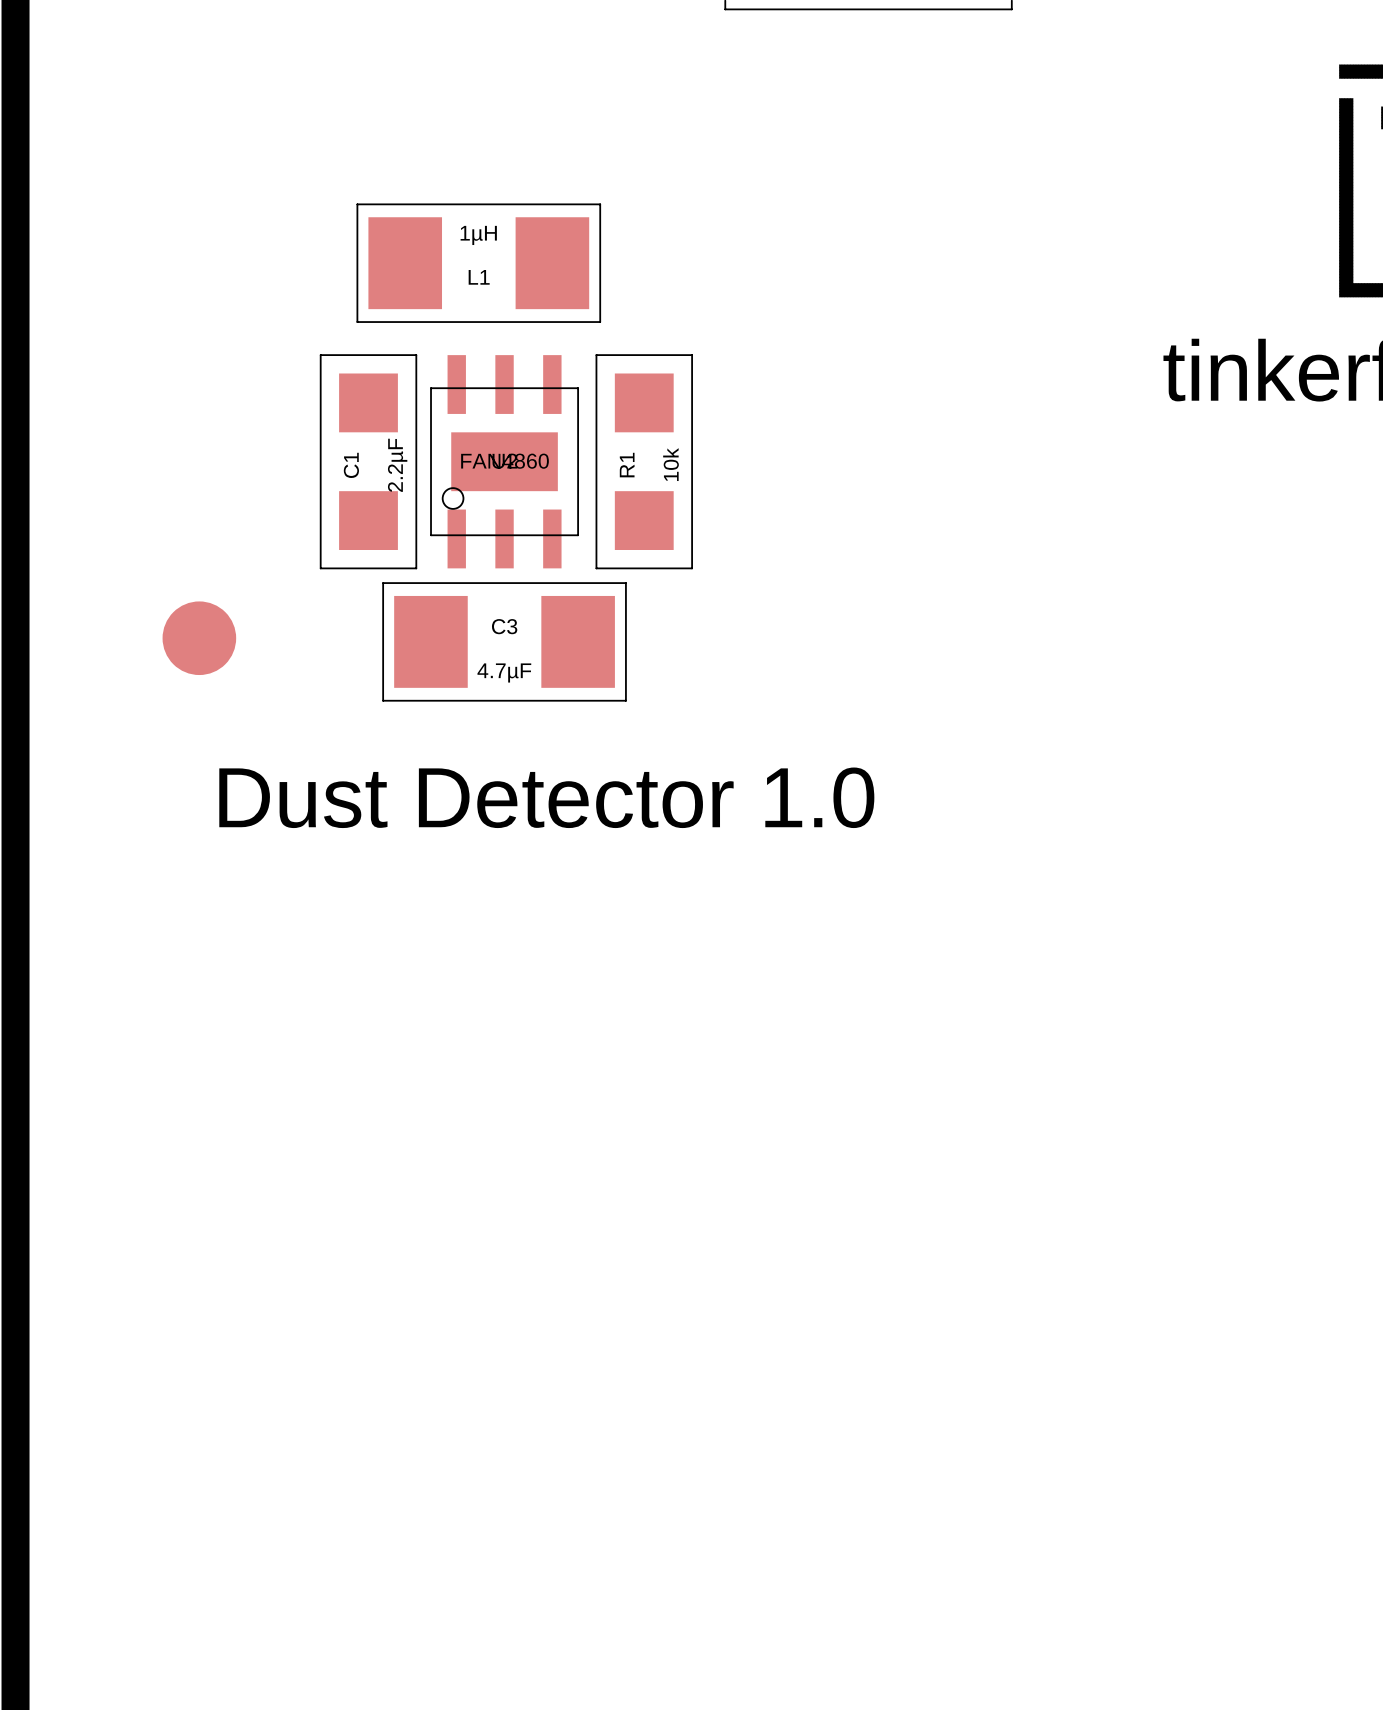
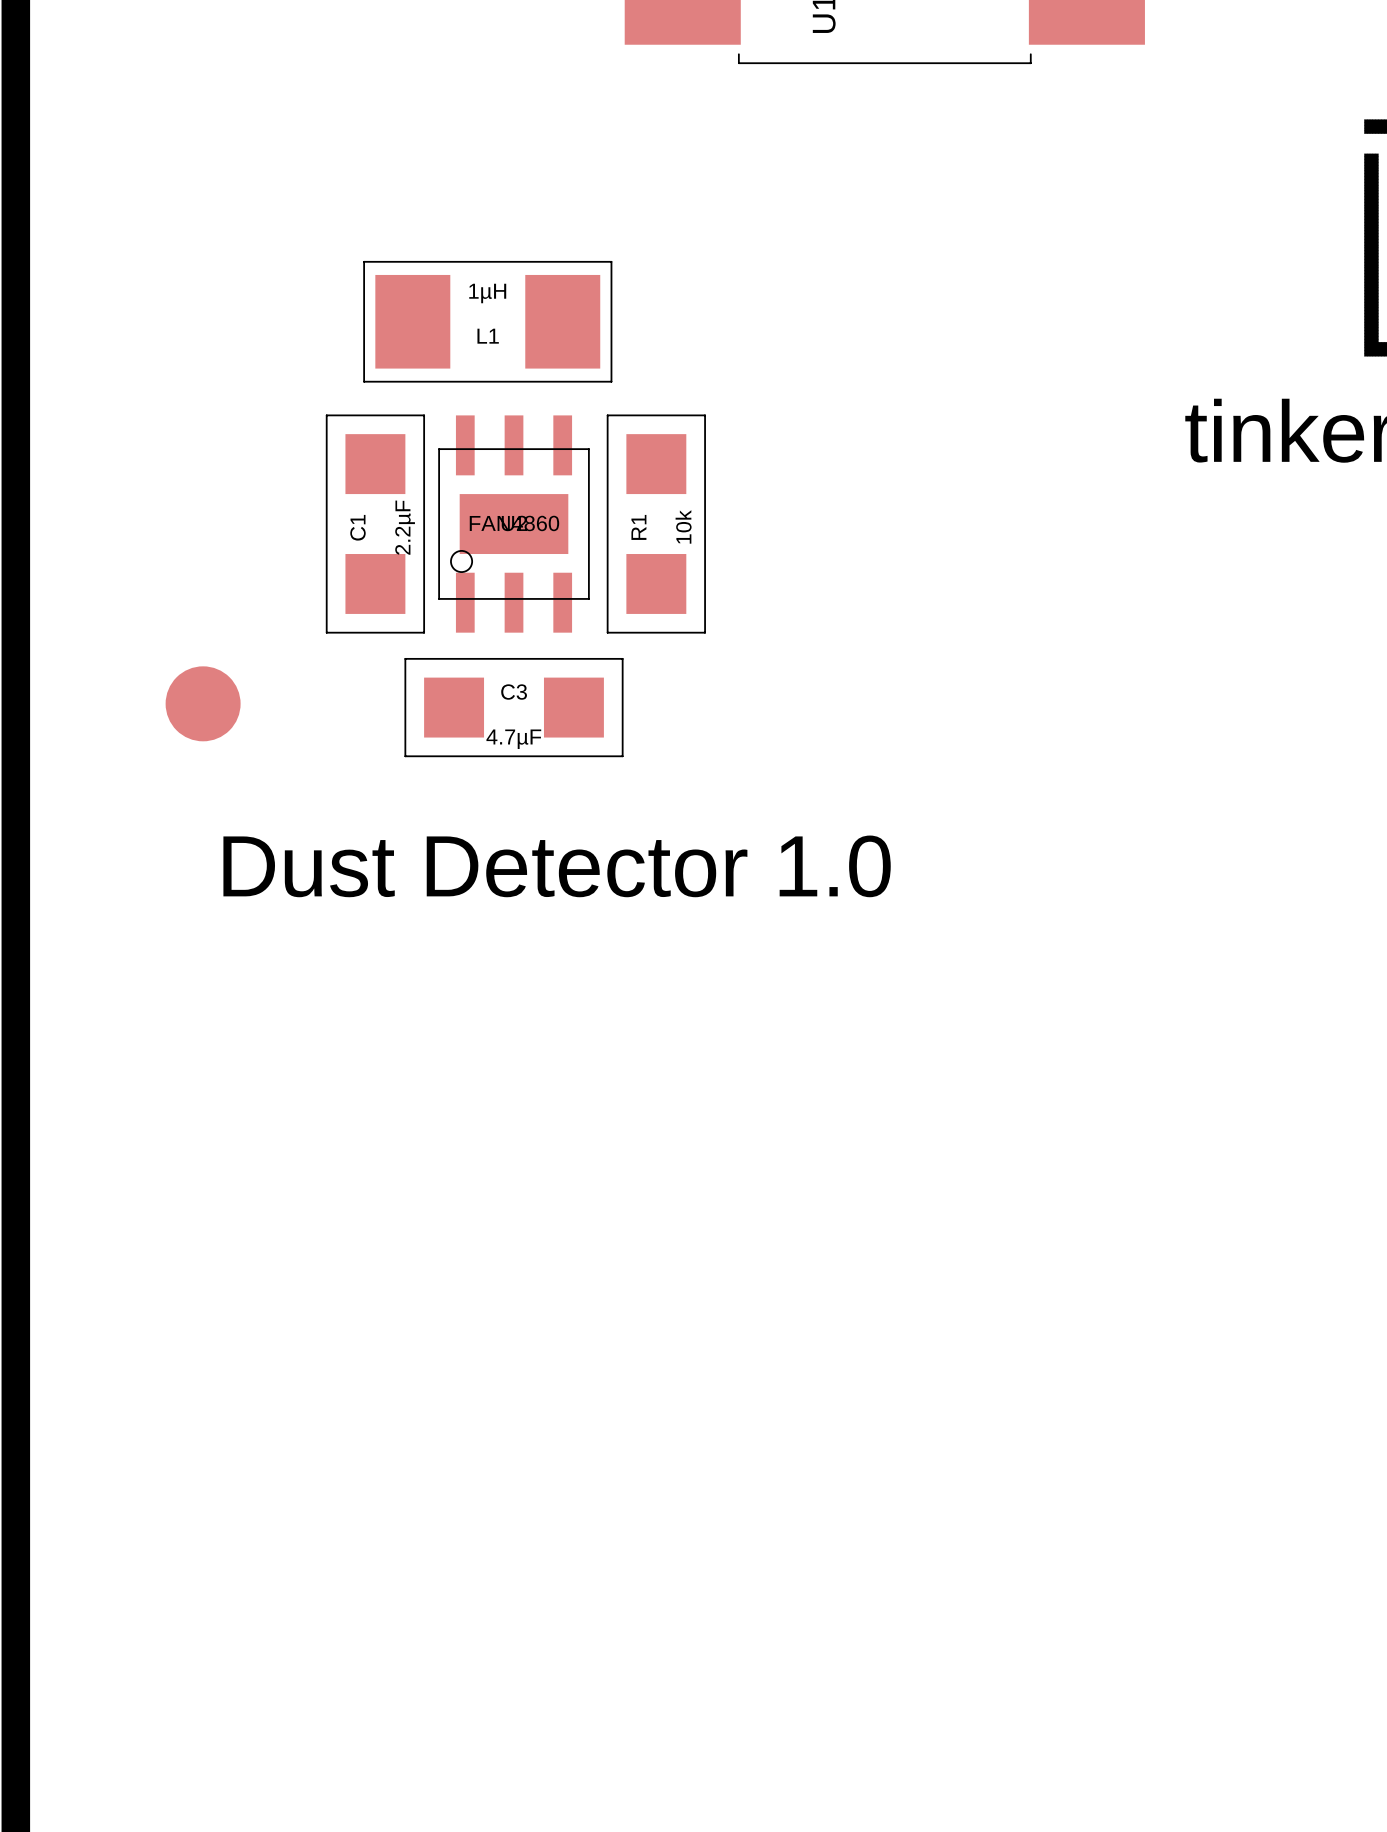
C3 footprint: [383, 583, 626, 701] -> [405, 658, 623, 757]

